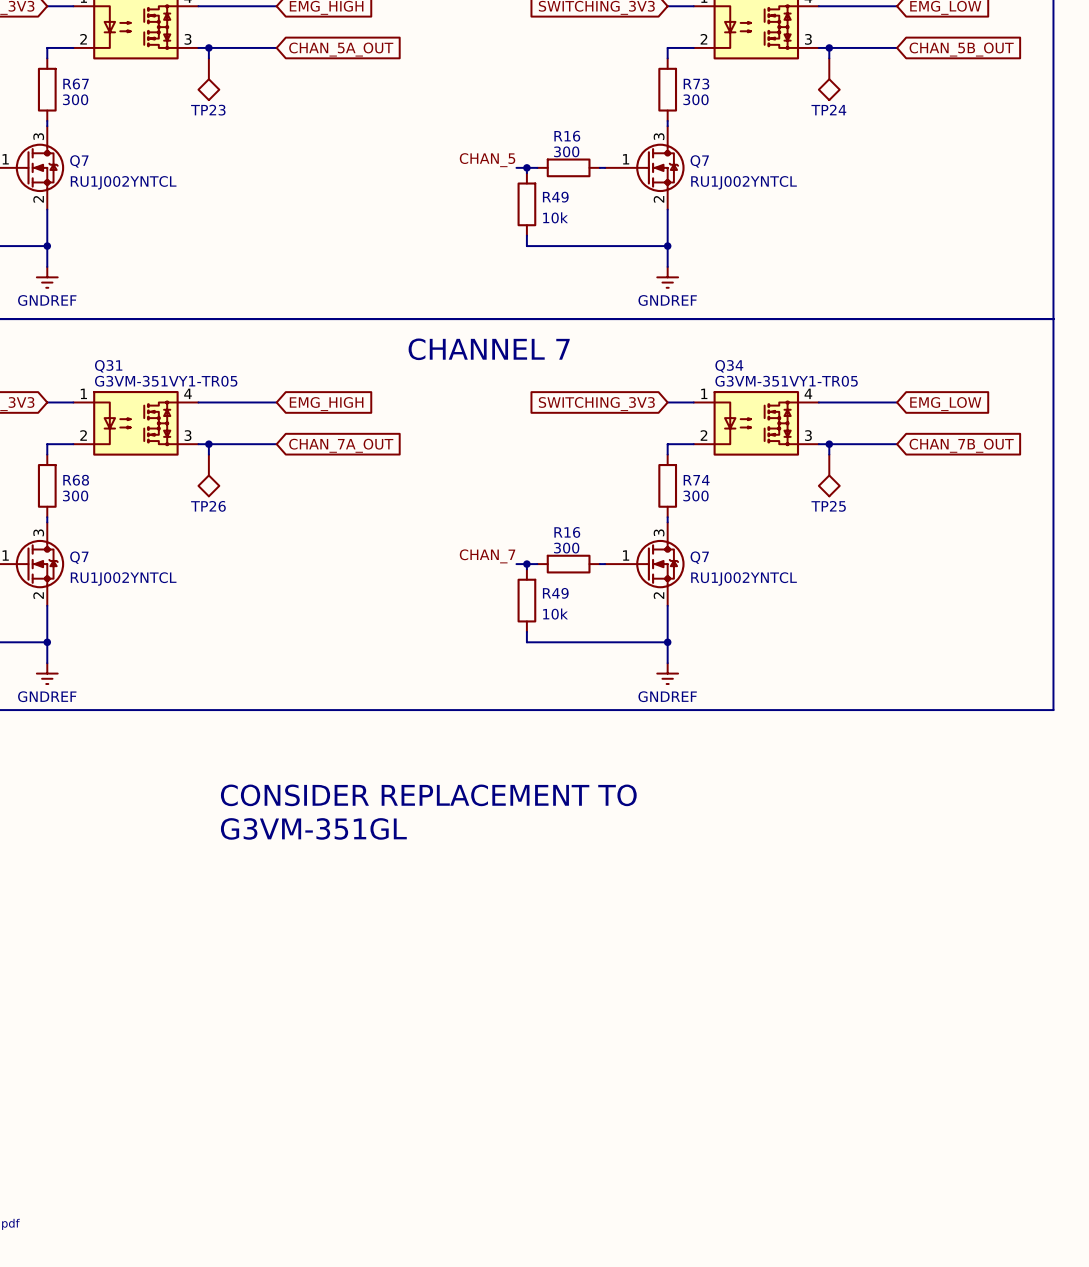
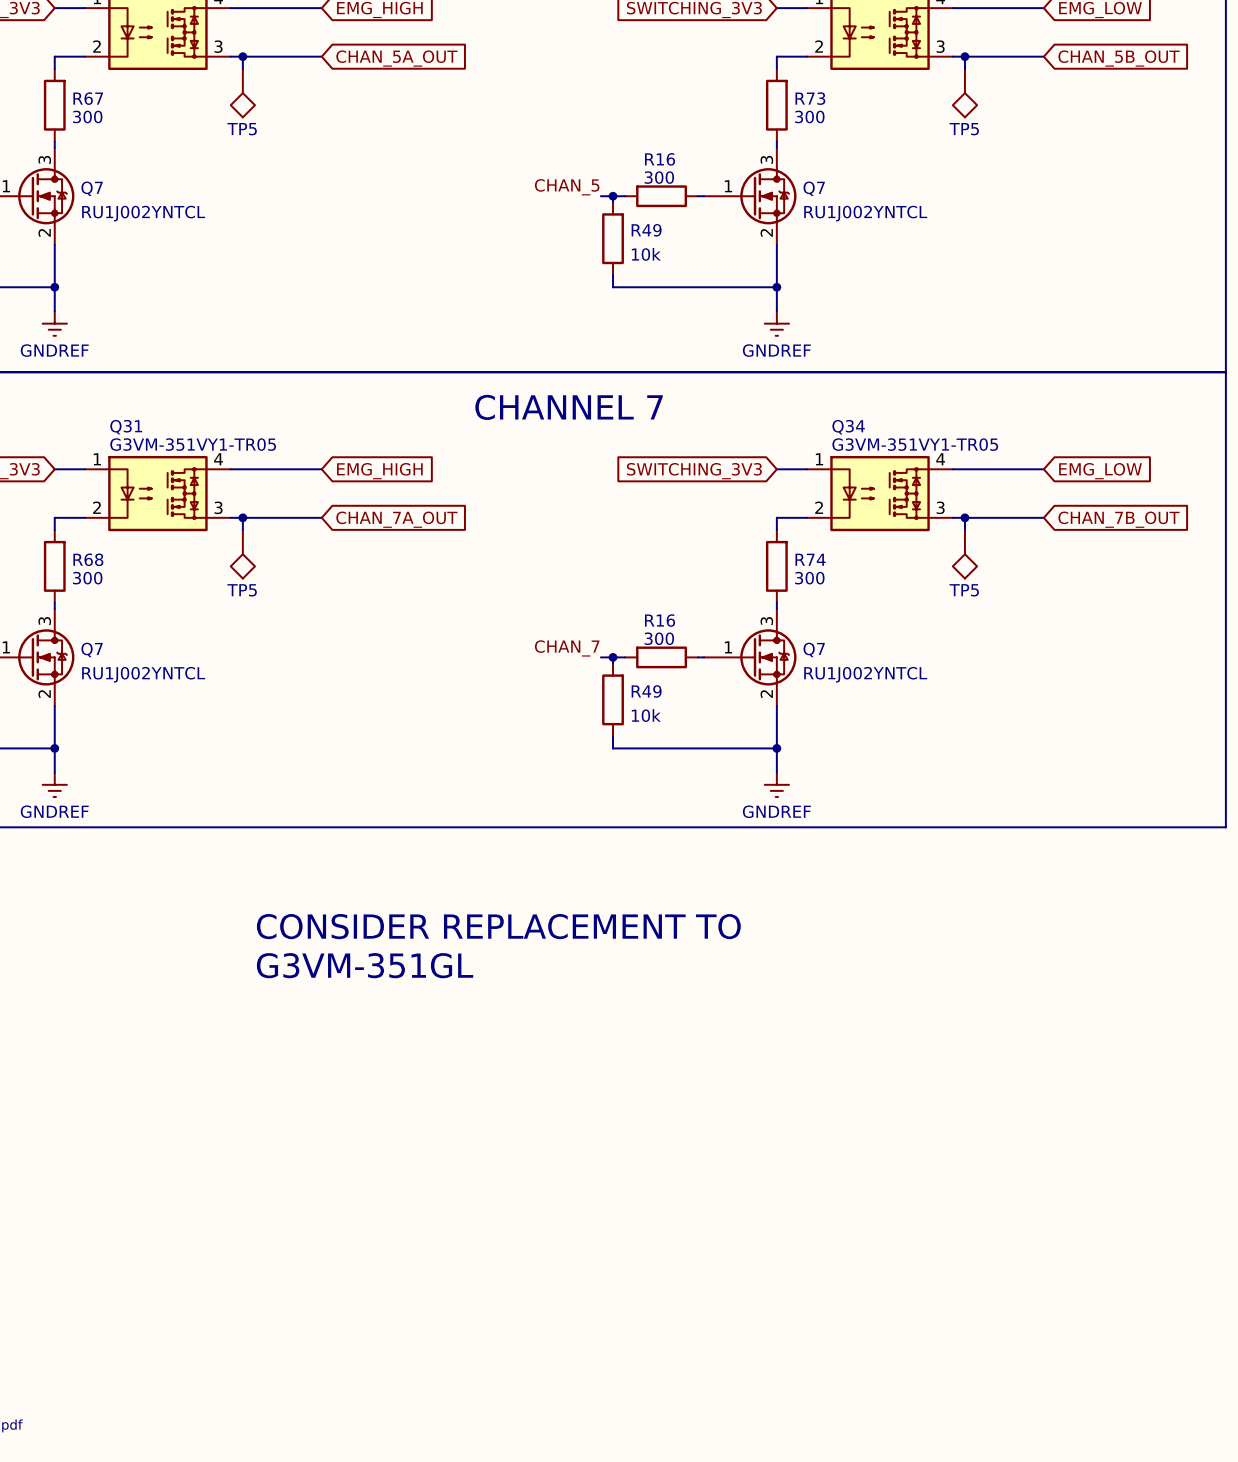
TP23 name: TP23 (208, 110) -> TP5 (242, 129)
TP24 name: TP24 (828, 110) -> TP5 (964, 129)
TP26 name: TP26 (208, 506) -> TP5 (242, 590)
TP25 name: TP25 (828, 506) -> TP5 (964, 590)

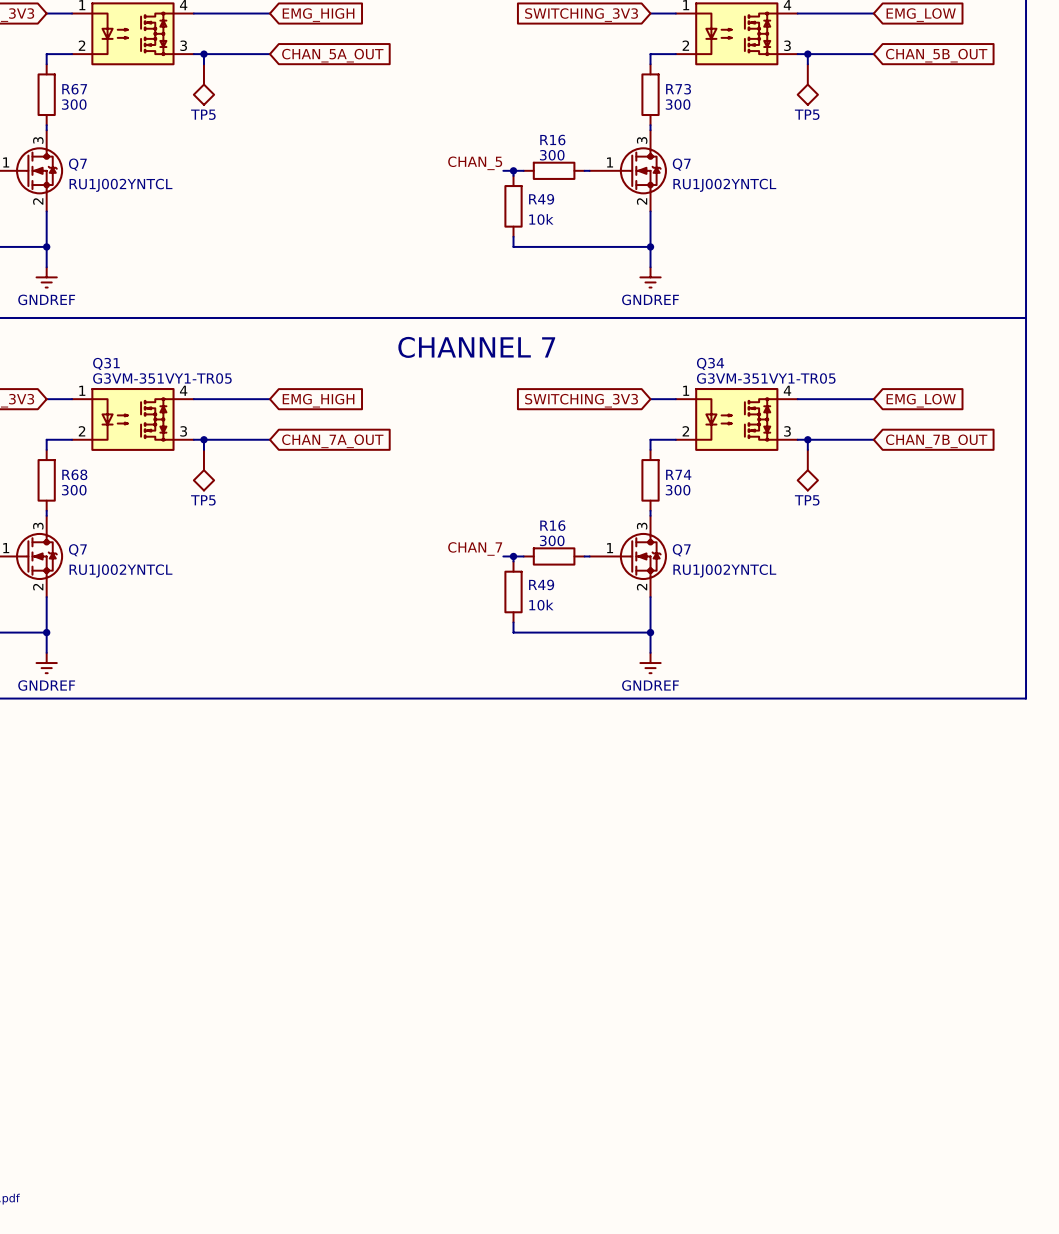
text: CONSIDER REPLACEMENT TO (498, 926) -> none
text: G3VM-351GL (365, 965) -> none

